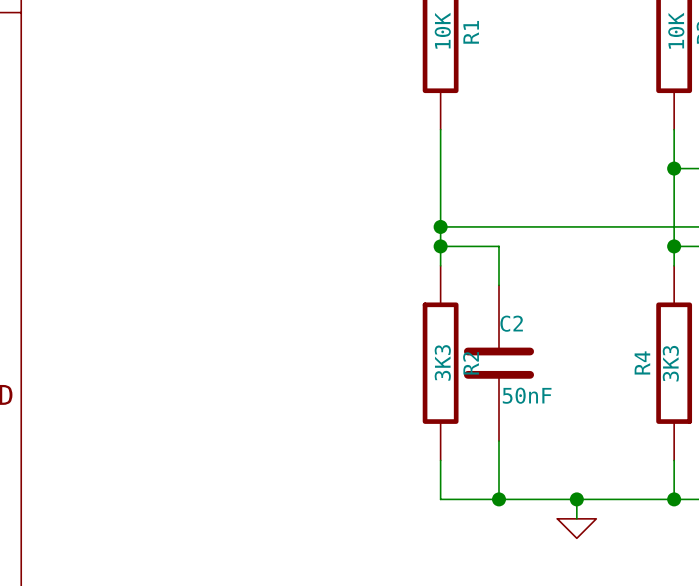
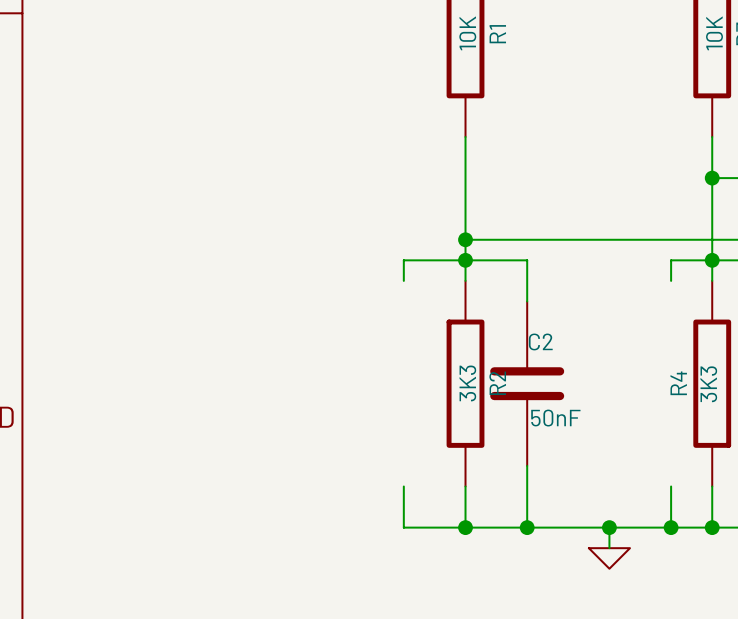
wire: none -> (465, 260) (403, 260) (403, 280)
wire: none -> (712, 260) (671, 260) (671, 280)
wire: none -> (403, 486) (403, 527) (465, 527)
wire: none -> (671, 486) (671, 527)
junction: none -> (465, 527)
junction: none -> (671, 527)

